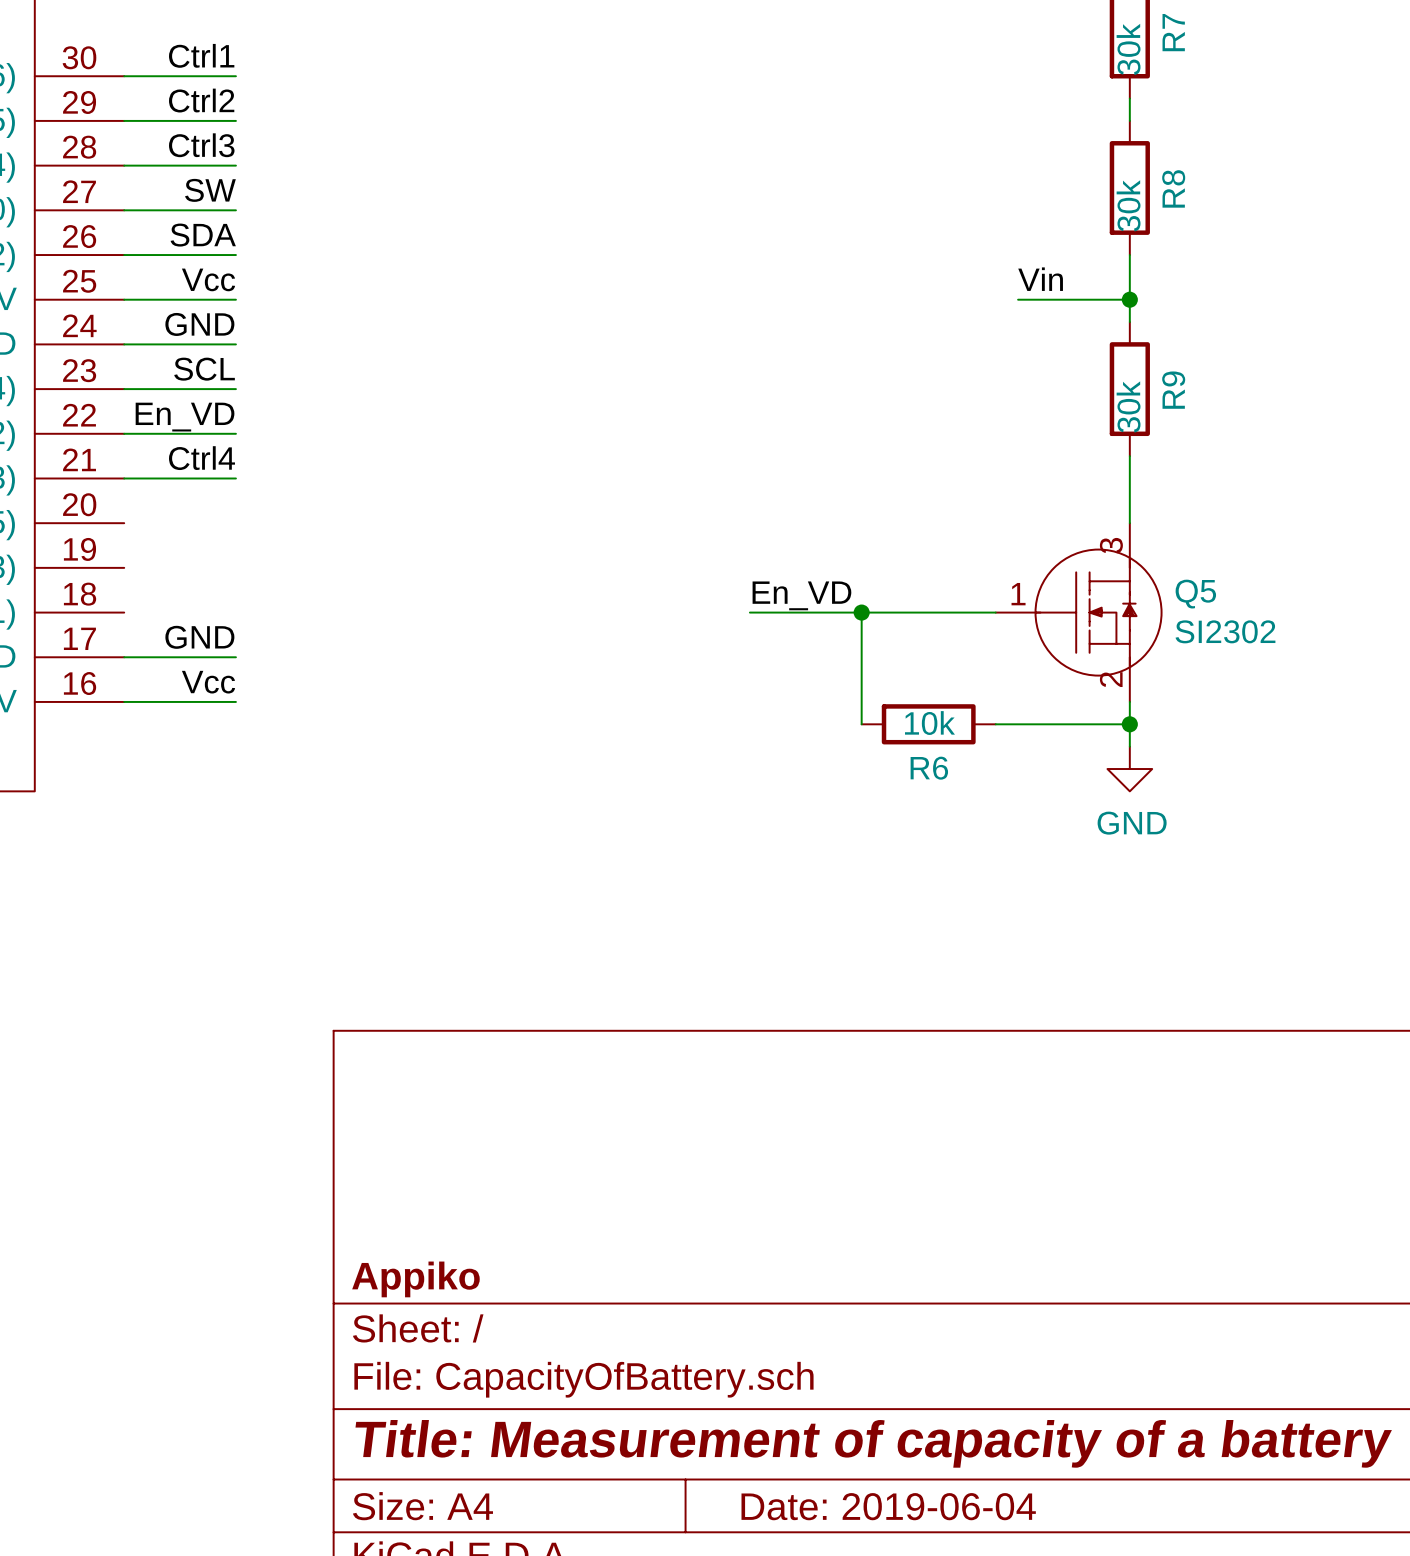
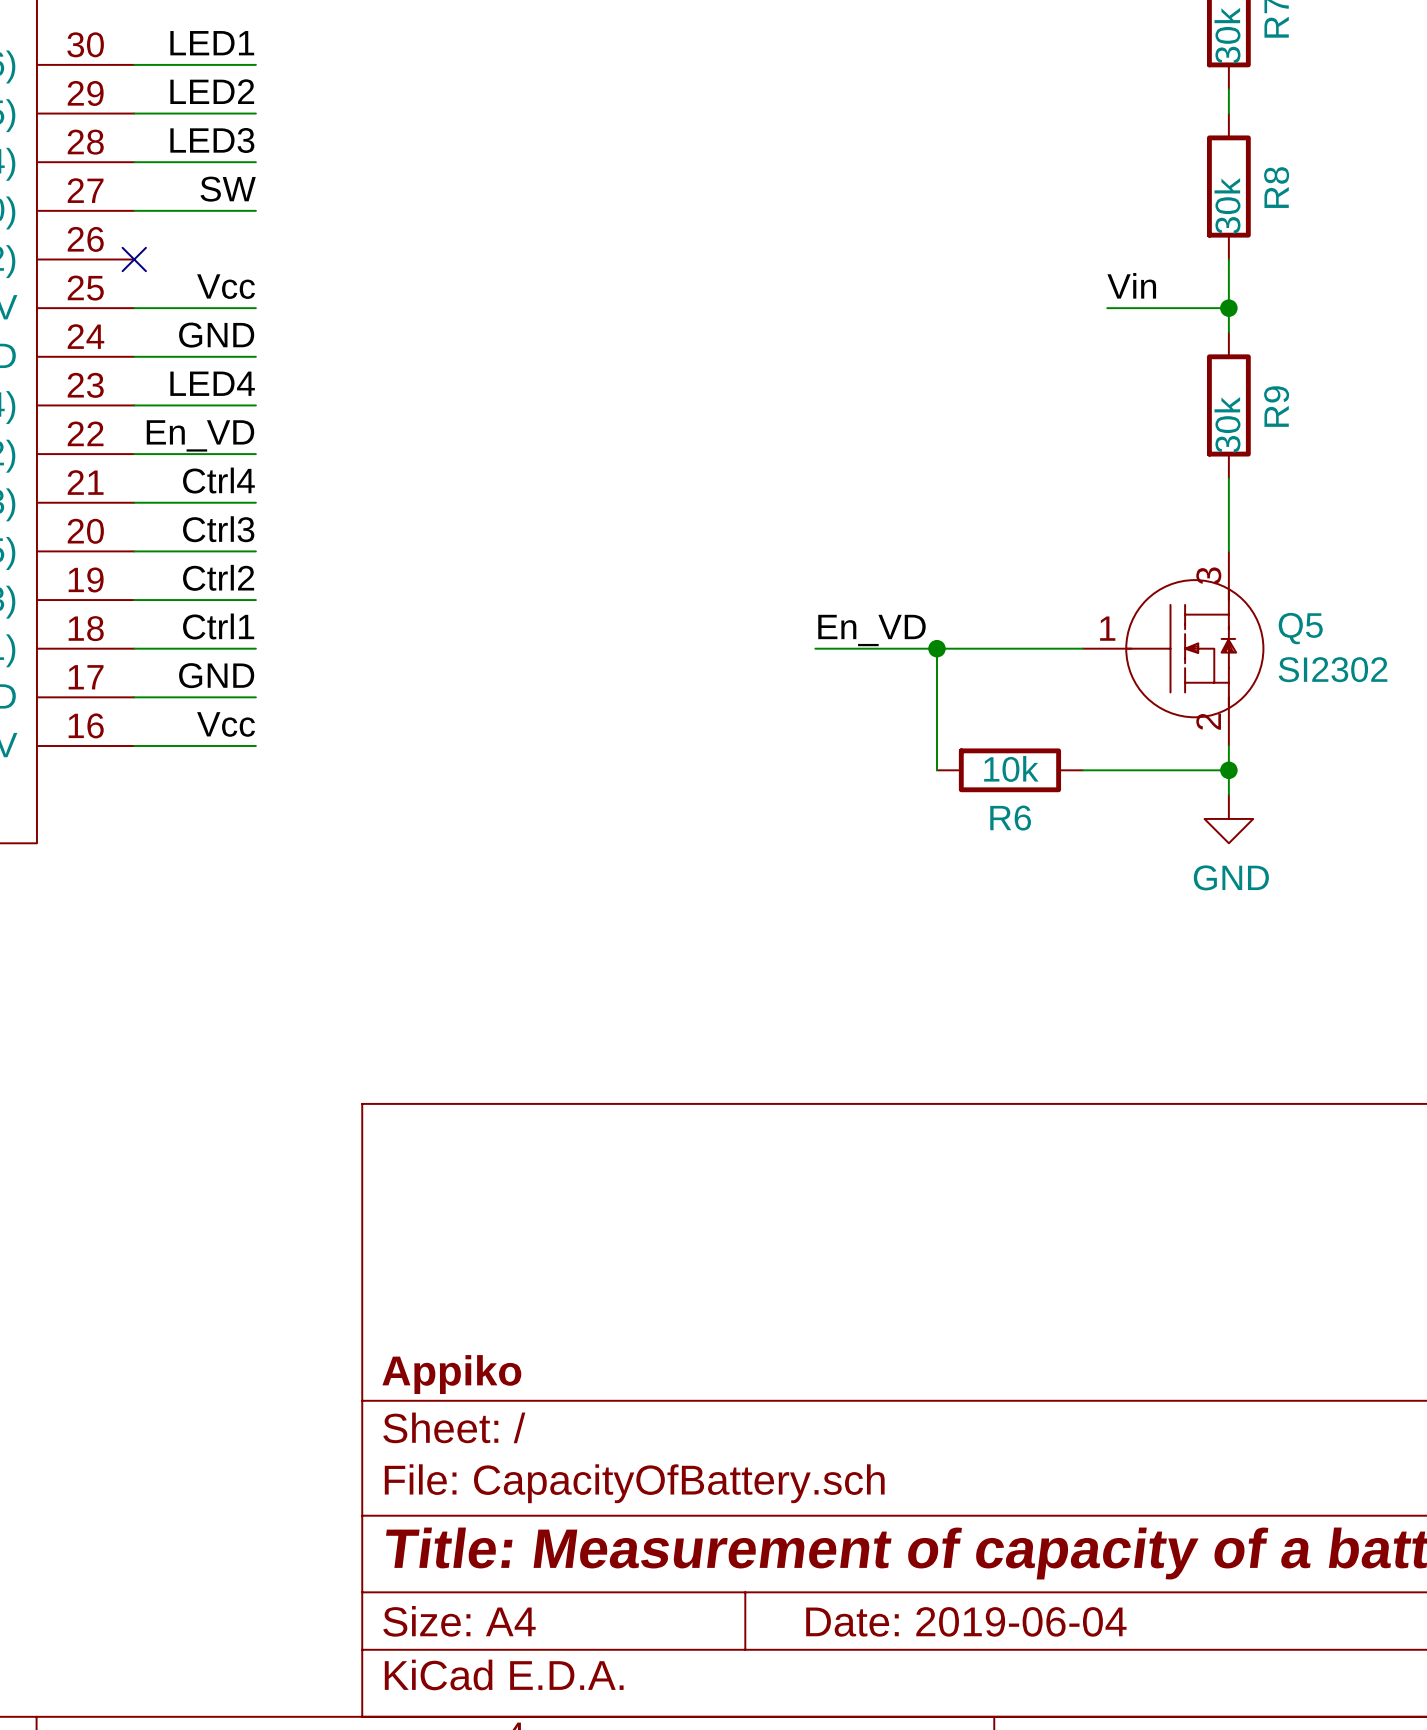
label: Ctrl1 (201, 55) -> LED1 (212, 43)
label: Ctrl2 (201, 100) -> LED2 (212, 91)
label: Ctrl3 (201, 145) -> LED3 (212, 140)
label: SDA (203, 235) -> none
wire: (124, 255) (235, 255) -> (134, 551) (255, 551)
no-connect mark: none -> (134, 259)
label: SCL (204, 369) -> LED4 (212, 383)
label: none -> Ctrl3 (218, 529)
label: none -> Ctrl2 (218, 577)
wire: none -> (134, 600) (255, 600)
label: none -> Ctrl1 (218, 626)
wire: none -> (134, 648) (255, 648)

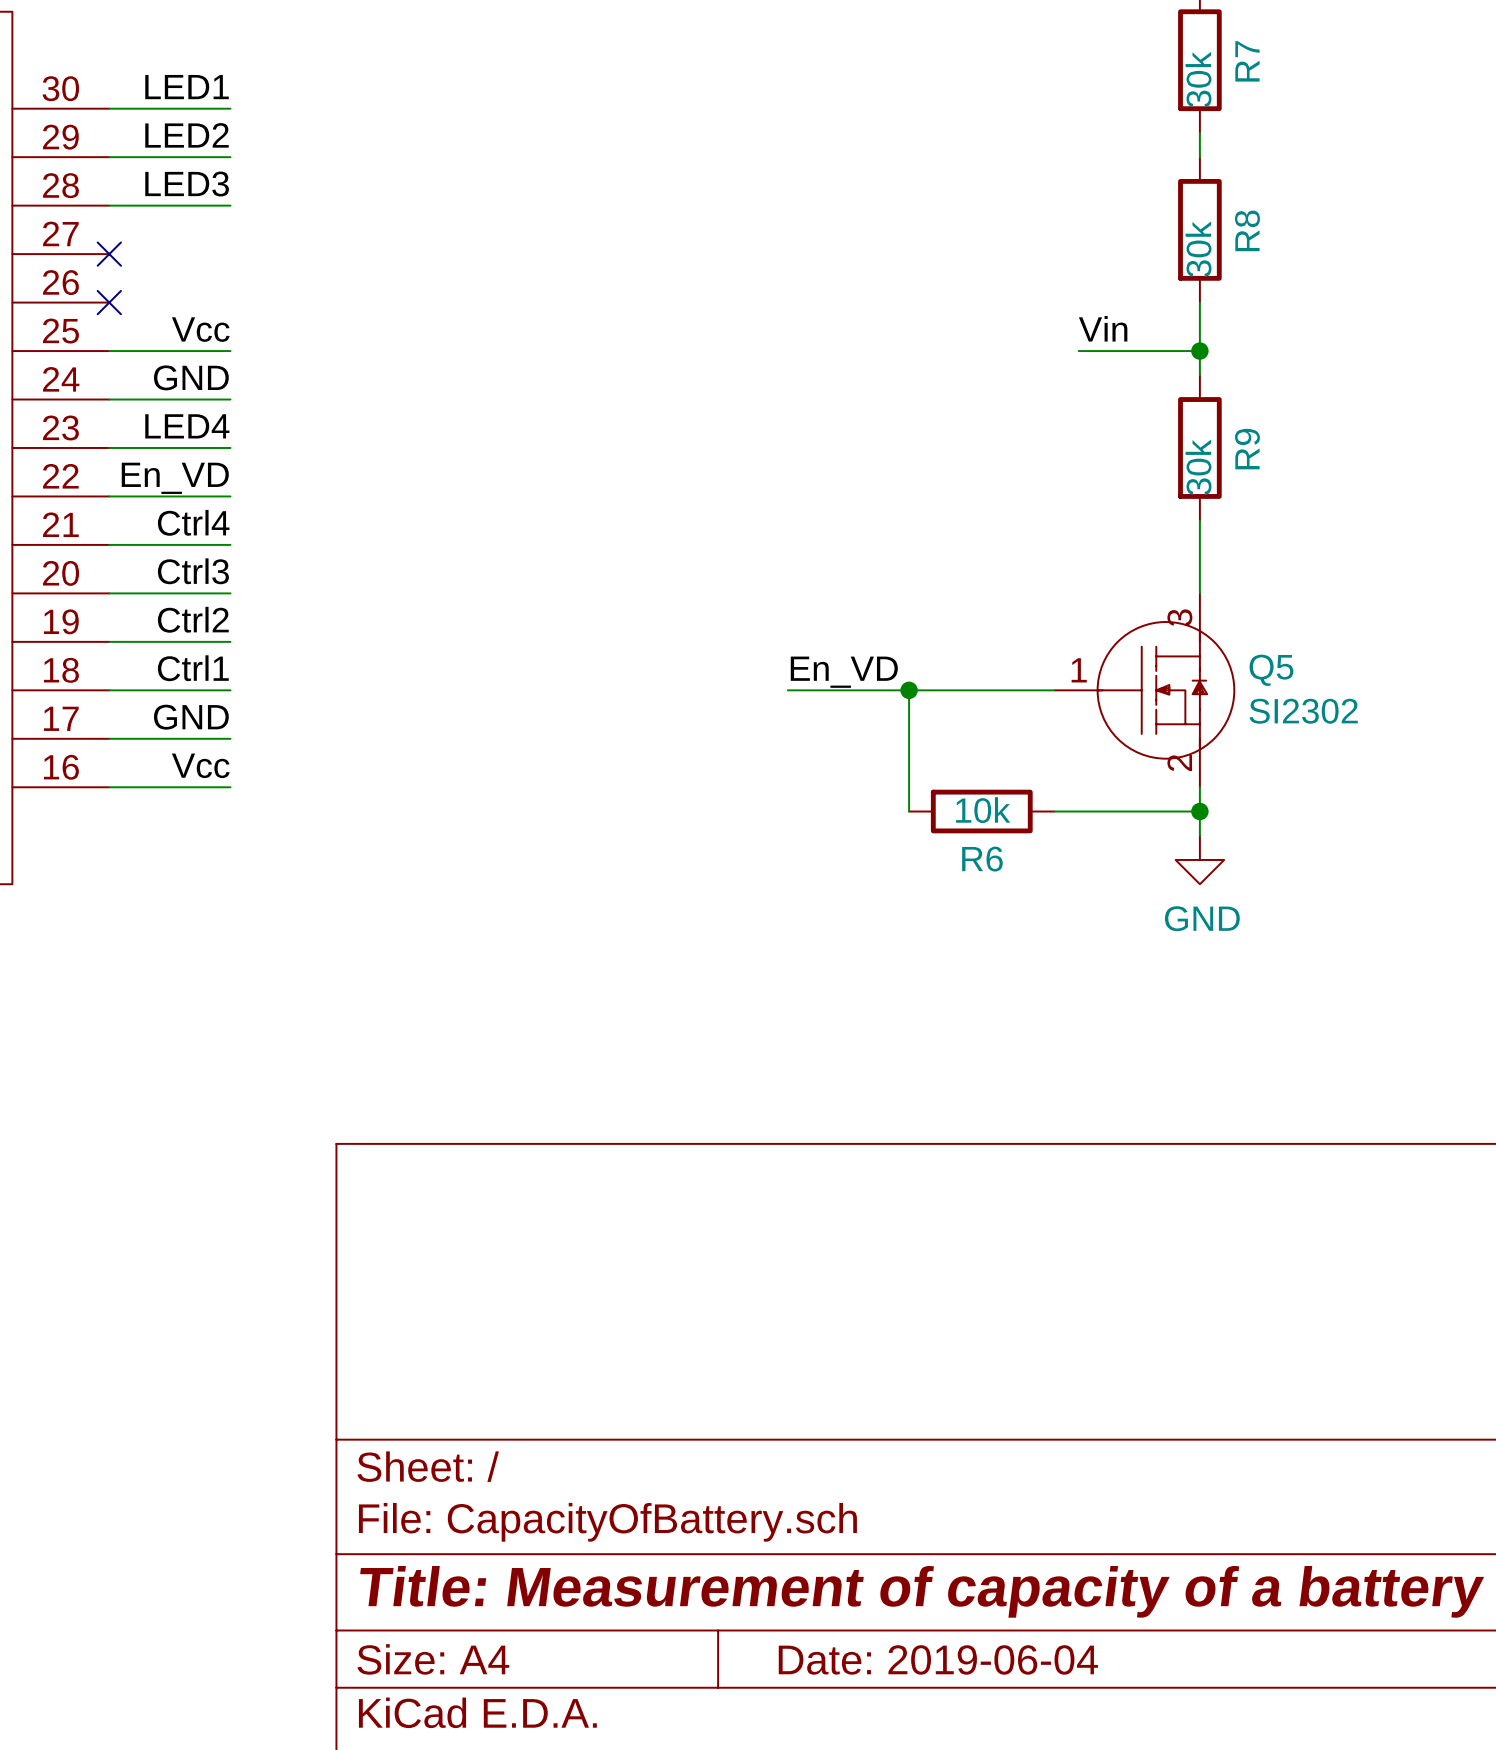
label: SW (228, 189) -> none
wire: (134, 210) (255, 210) -> none
no-connect mark: none -> (109, 254)
title block: Appiko (451, 1374) -> none

